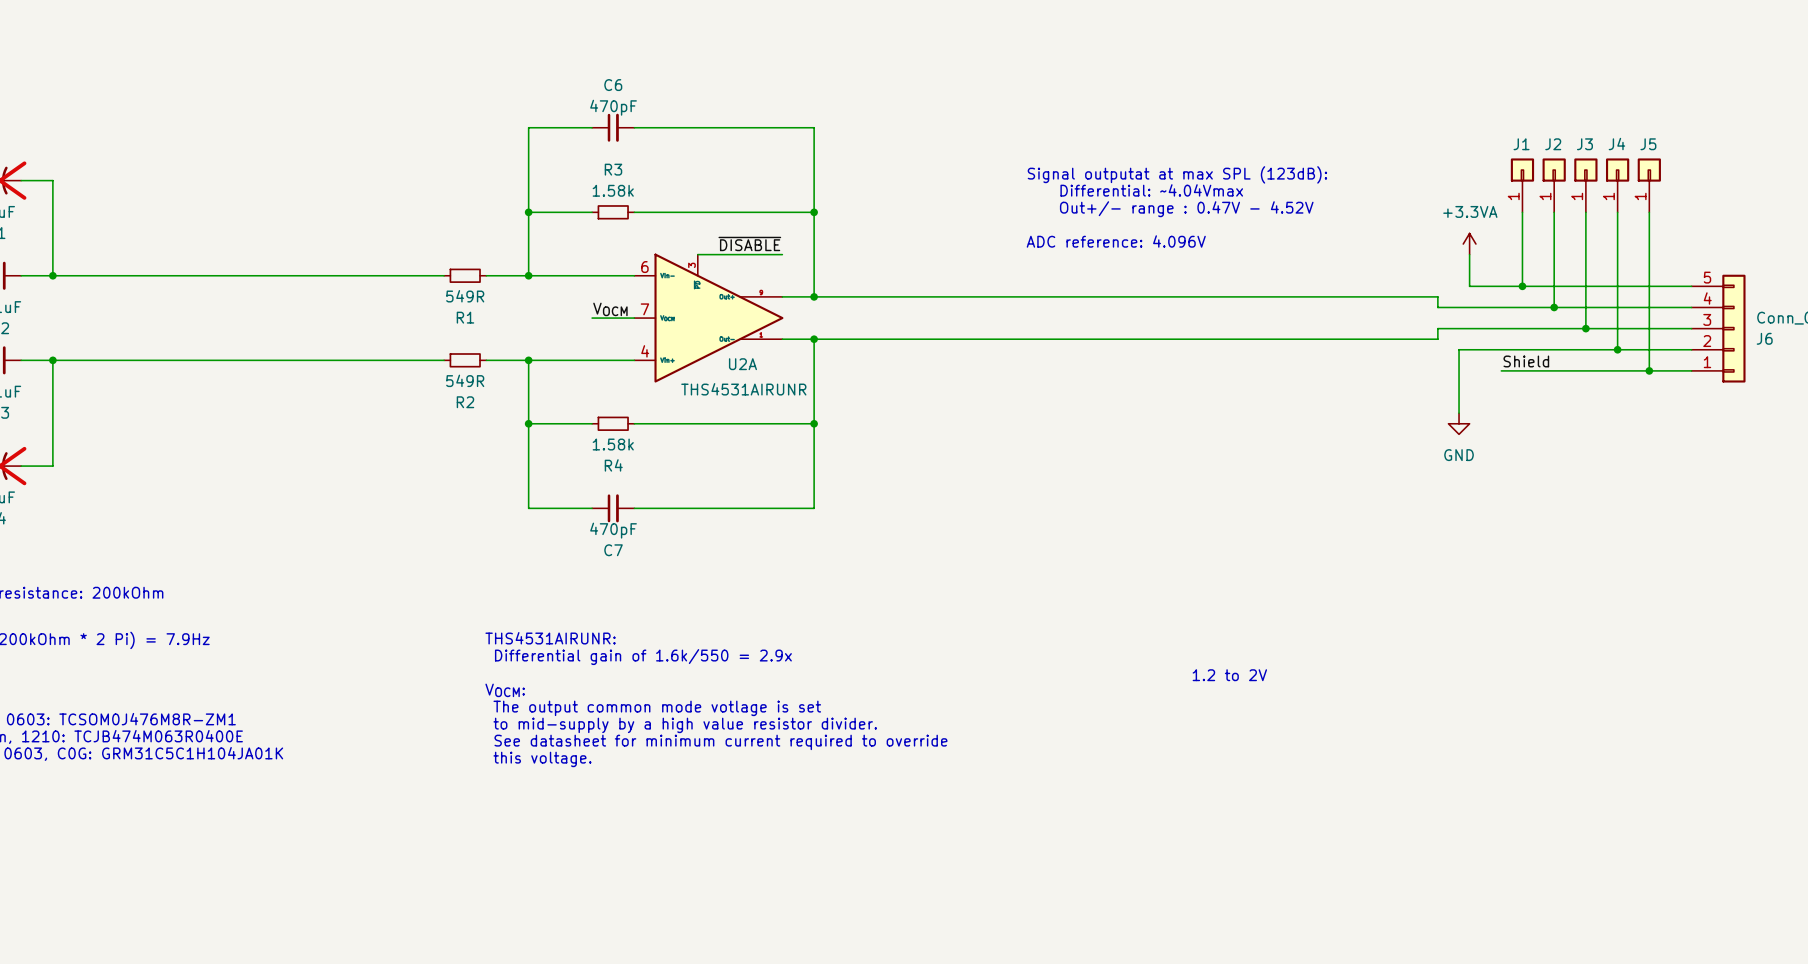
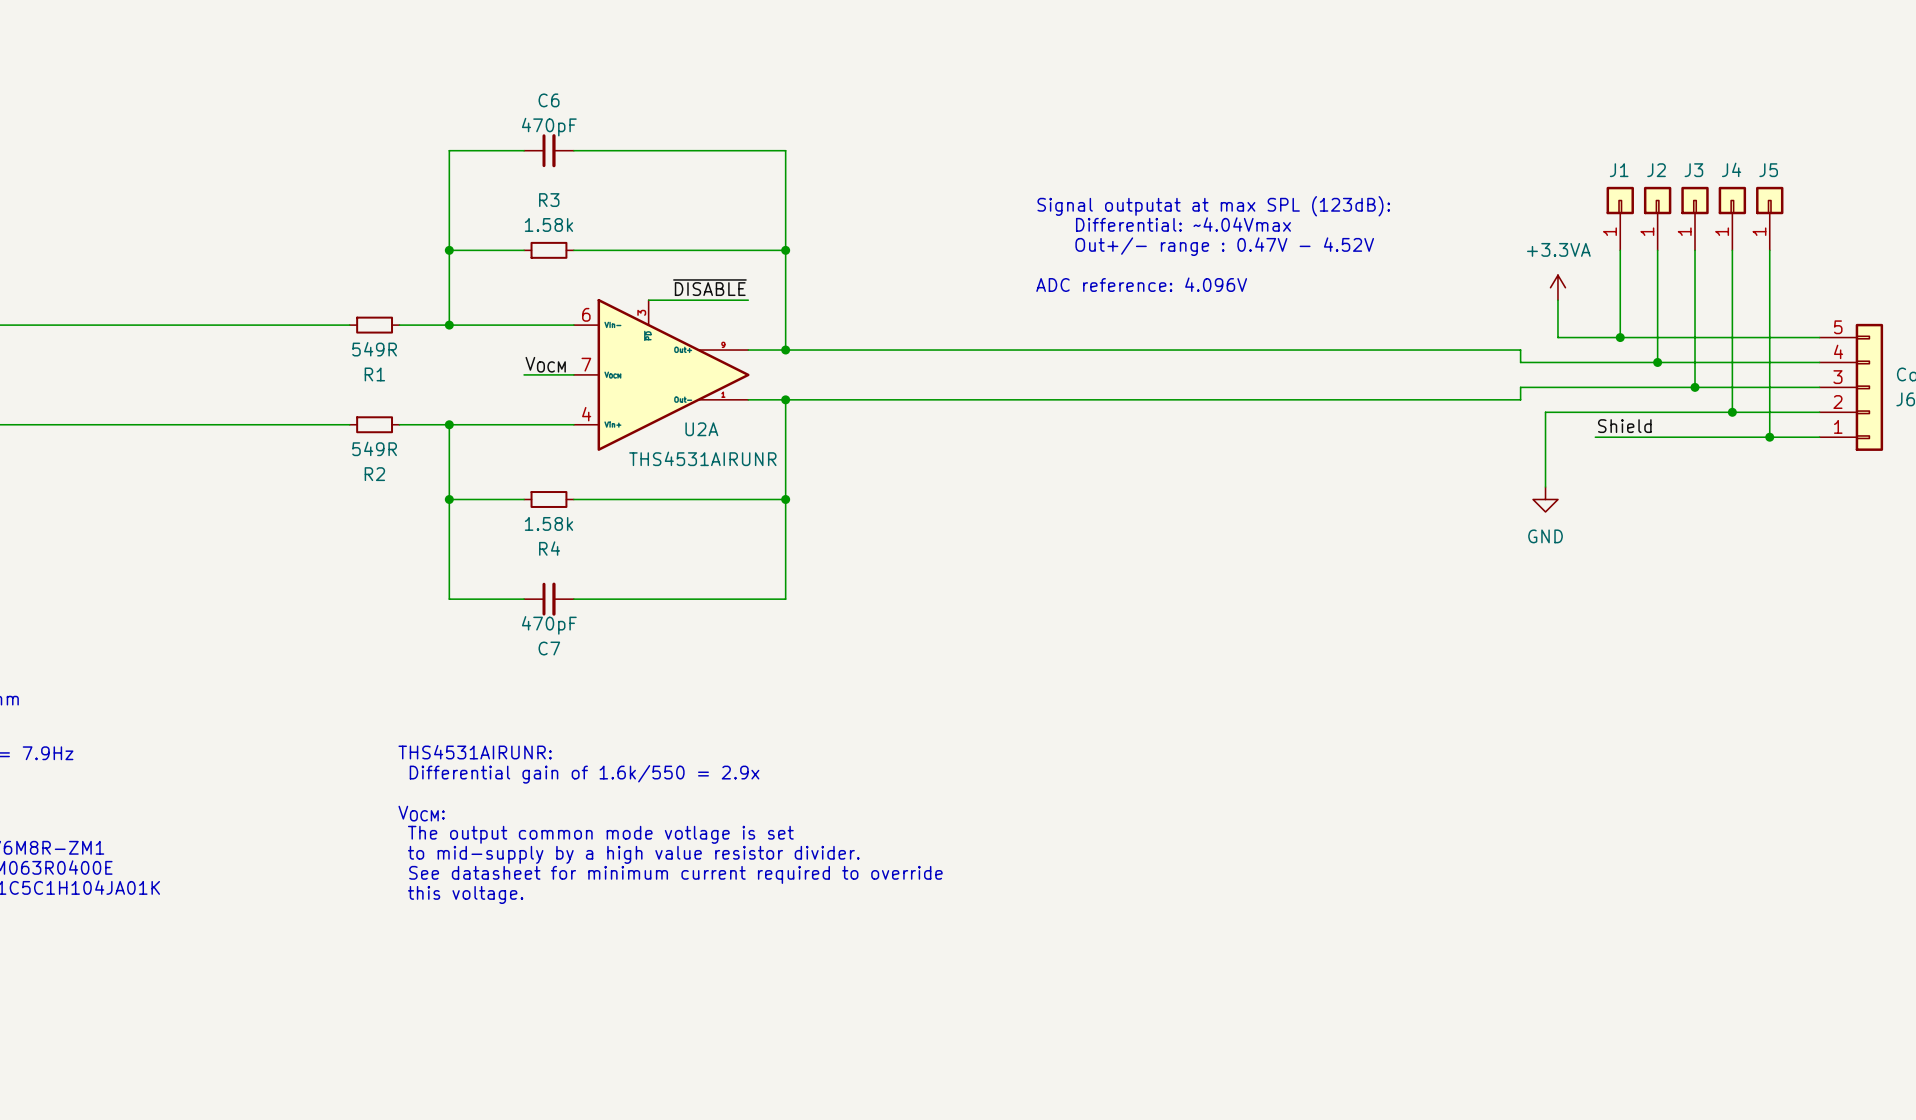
text: 1.2 to 2V (1229, 675) -> none

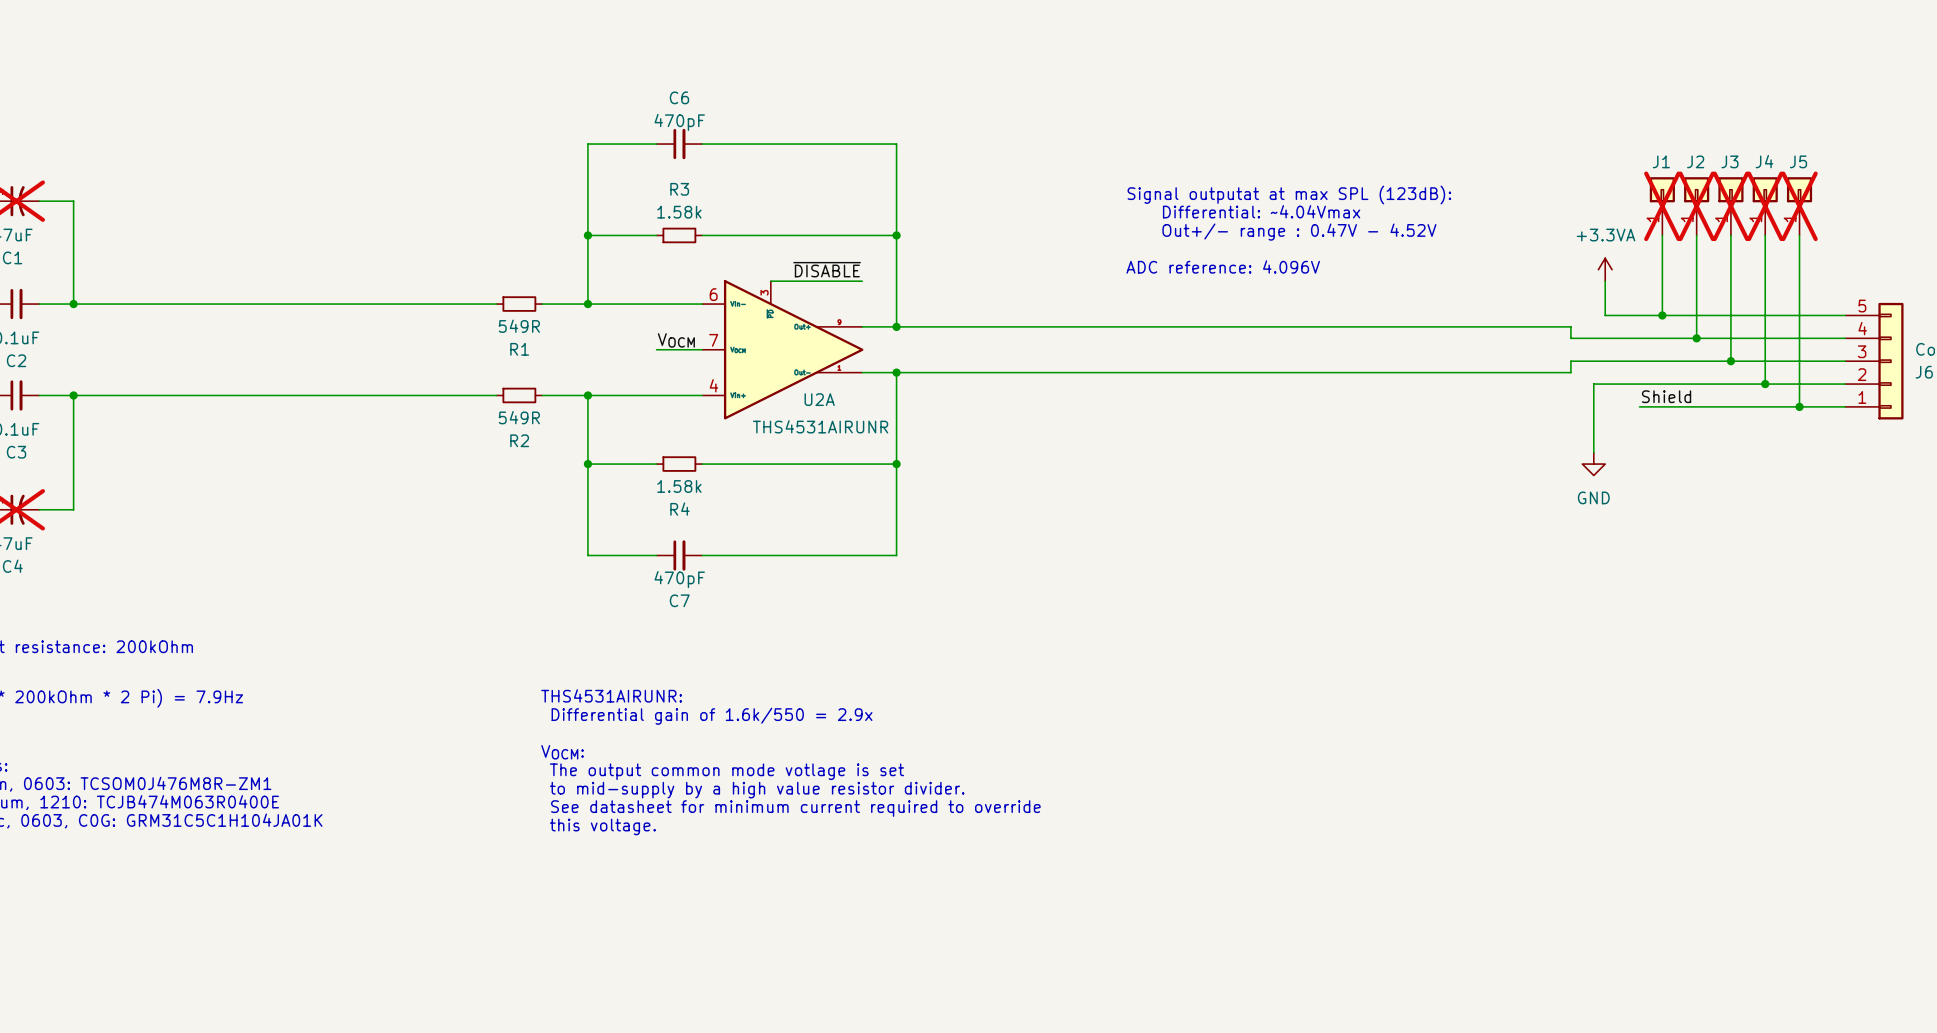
J1 do-not-place cross: none -> (1662, 206)
J2 do-not-place cross: none -> (1696, 206)
J3 do-not-place cross: none -> (1730, 206)
J4 do-not-place cross: none -> (1765, 206)
J5 do-not-place cross: none -> (1799, 206)

